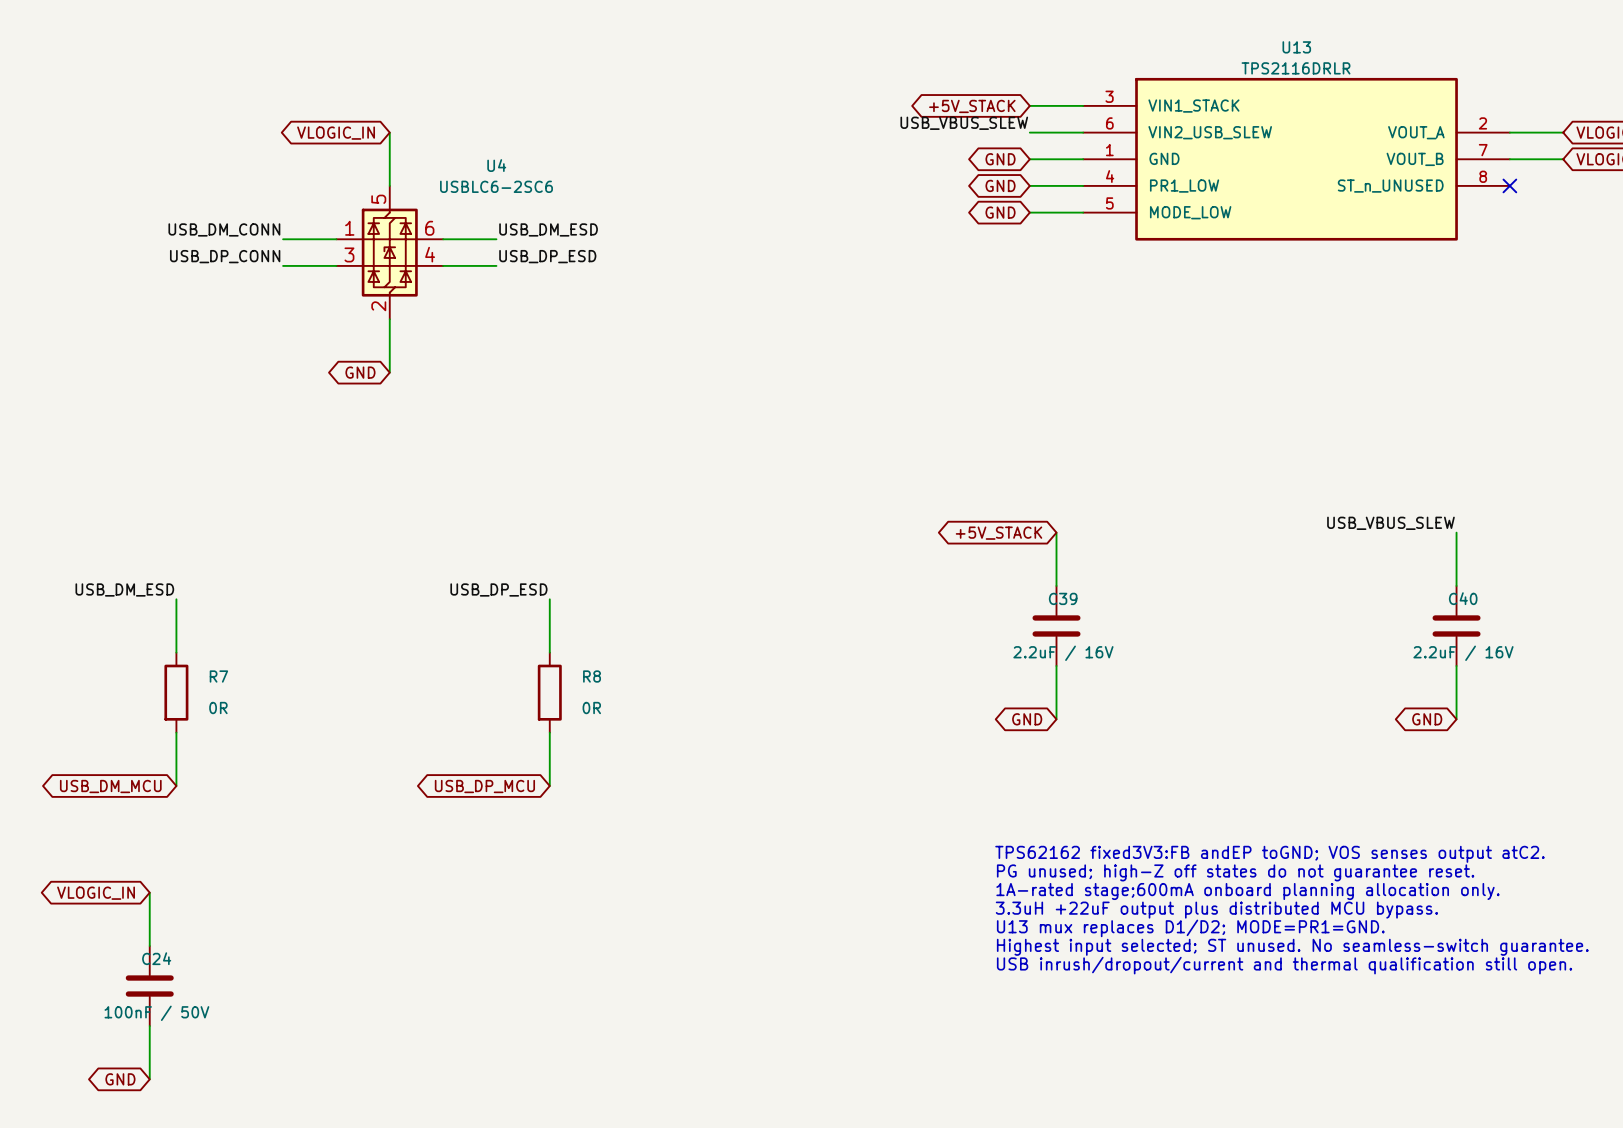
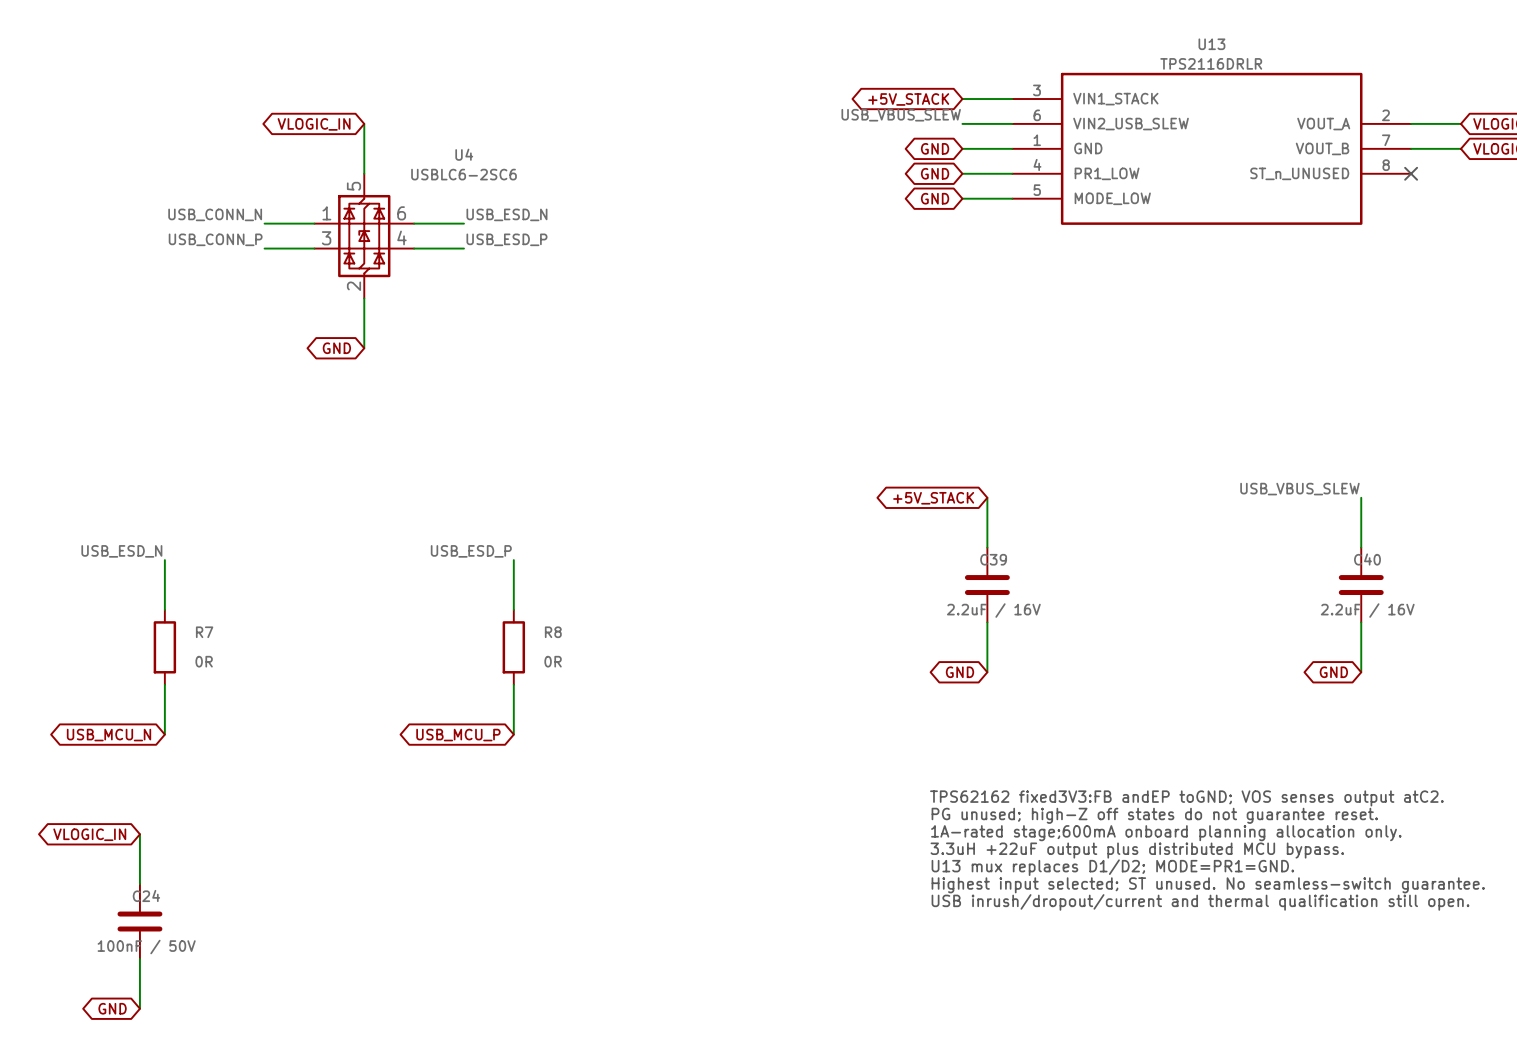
label: USB_DM_CONN (224, 229) -> USB_CONN_N (215, 214)
label: USB_DM_ESD (548, 229) -> USB_ESD_N (506, 214)
label: USB_DP_CONN (225, 256) -> USB_CONN_P (215, 239)
label: USB_DP_ESD (547, 256) -> USB_ESD_P (506, 239)
label: USB_DM_ESD (124, 589) -> USB_ESD_N (121, 551)
label: USB_DP_ESD (498, 589) -> USB_ESD_P (471, 551)
global label: USB_DM_MCU (110, 786) -> USB_MCU_N (109, 735)
global label: USB_DP_MCU (484, 786) -> USB_MCU_P (458, 735)

